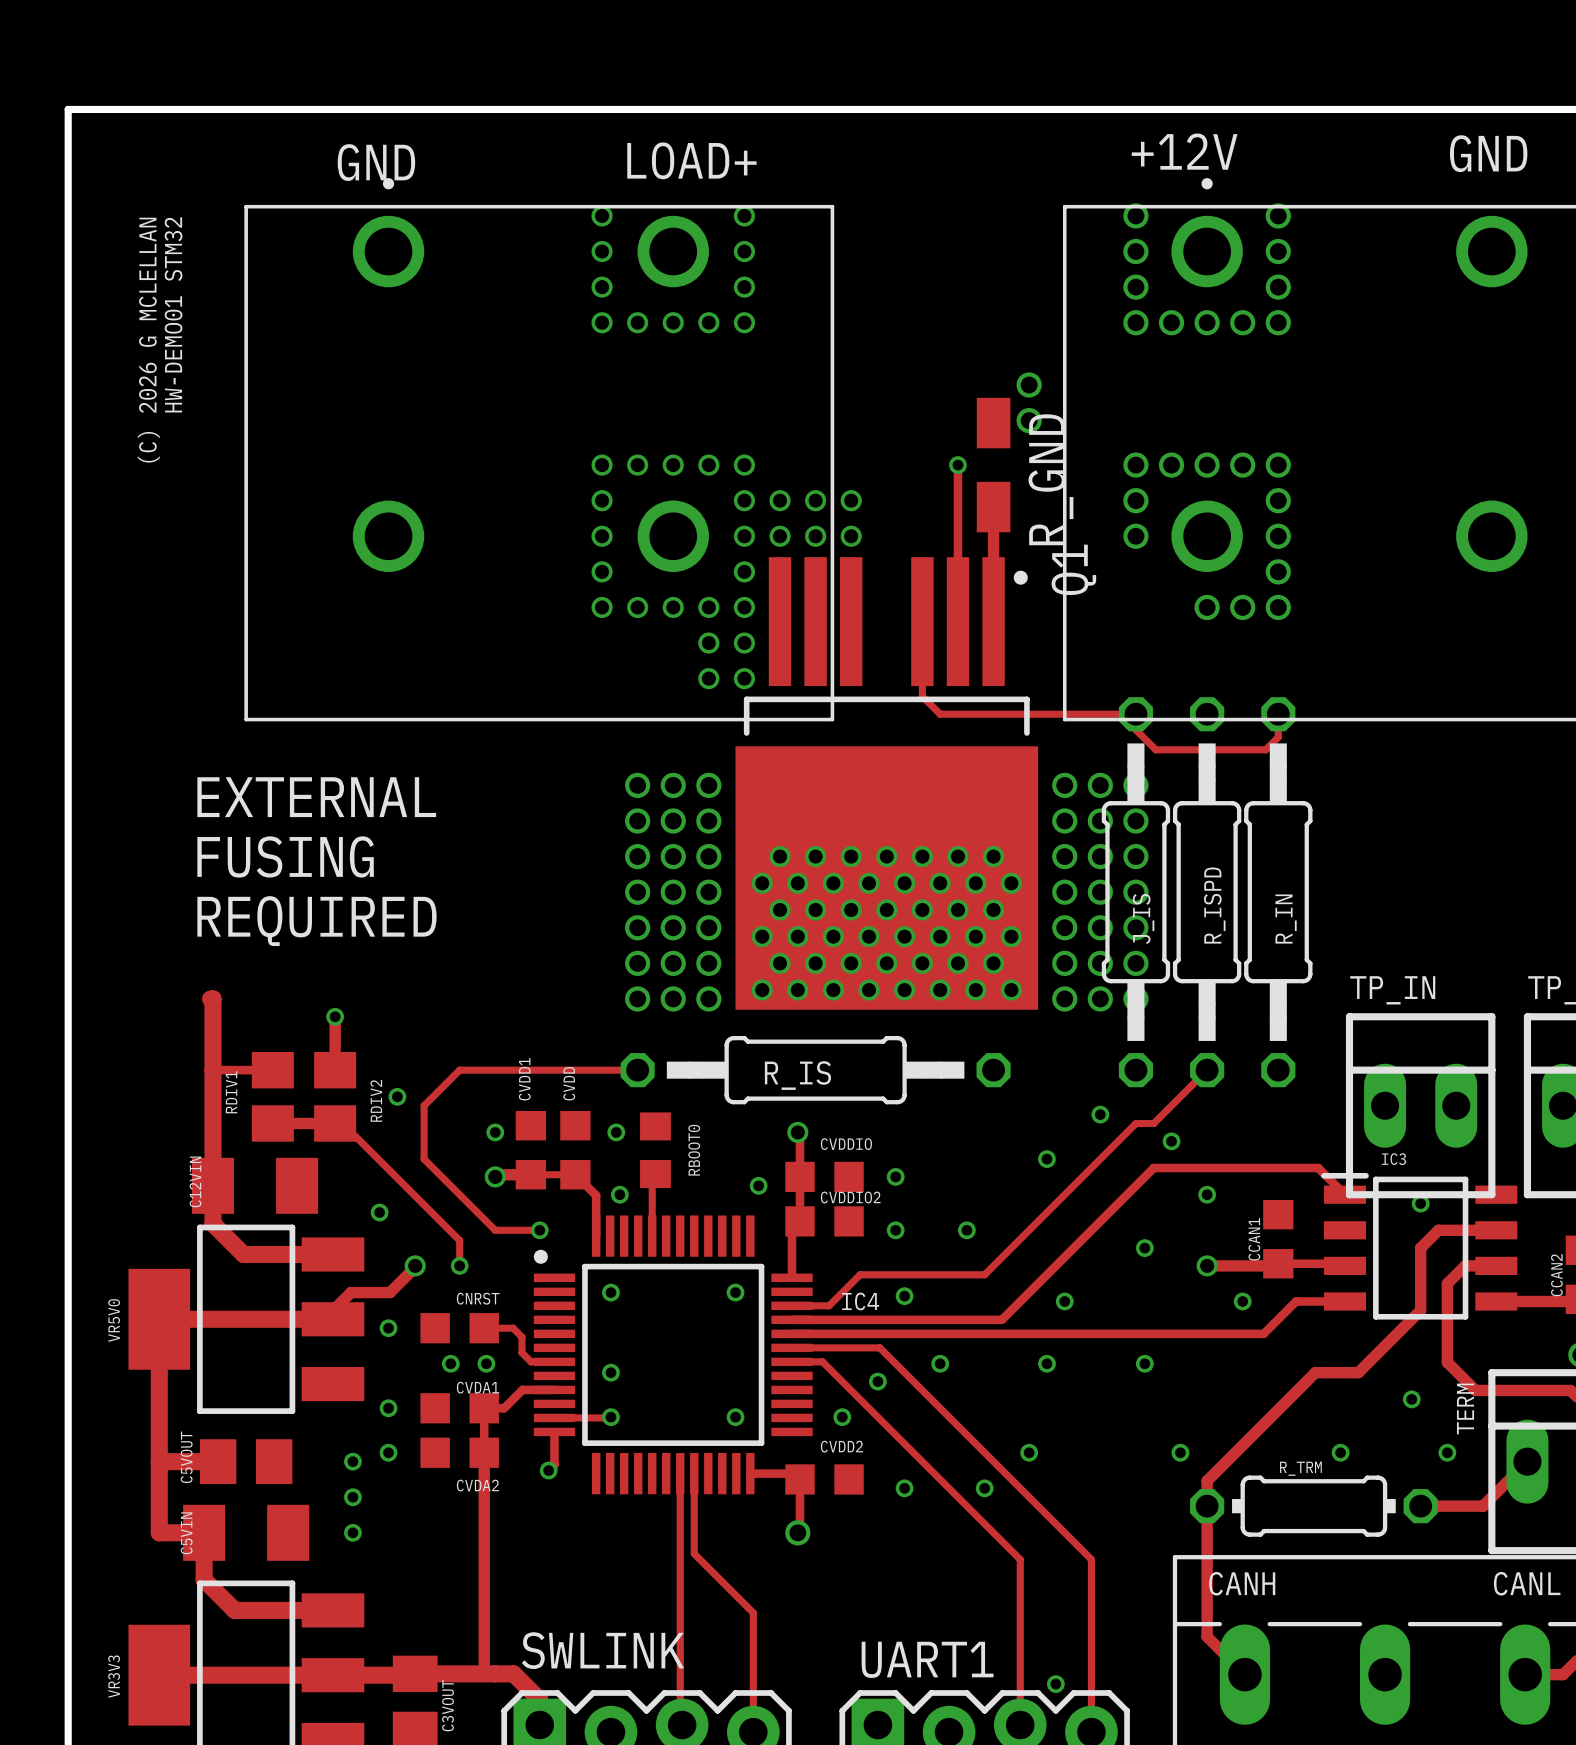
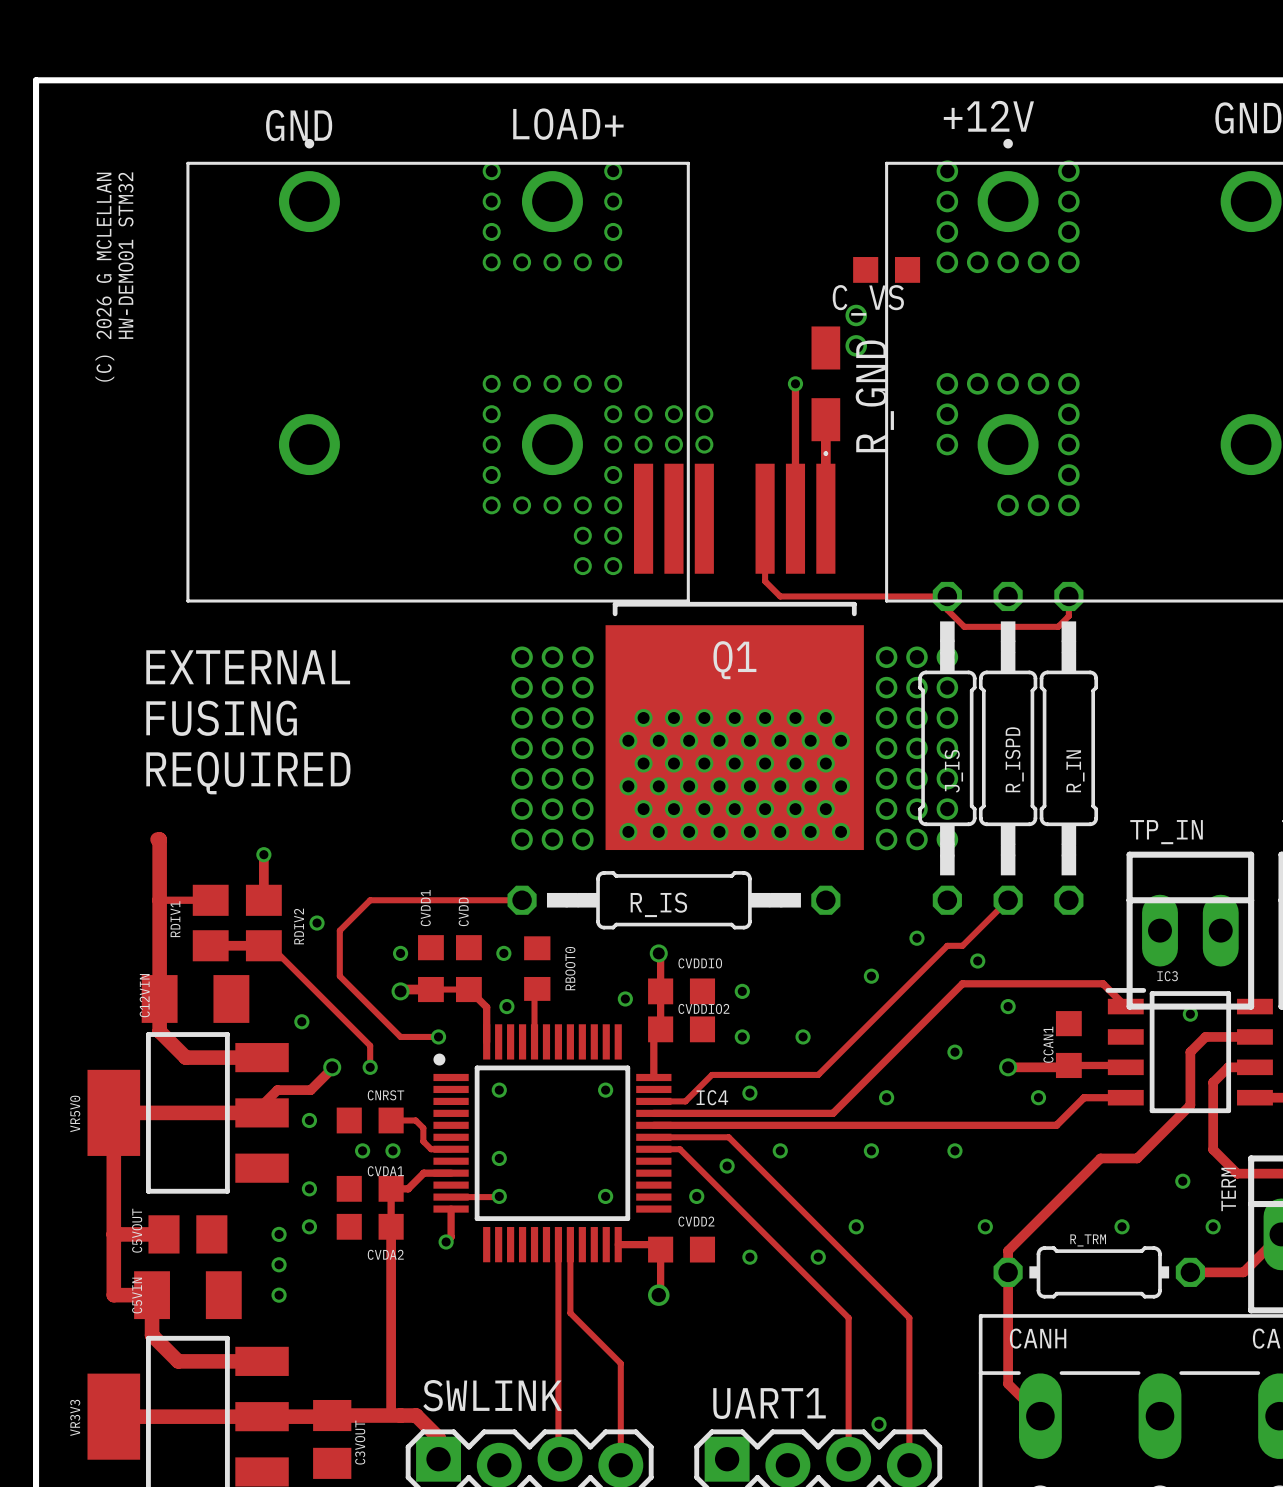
C_VS: none -> (886, 269)
Q1 footprint: [735, 557, 1039, 1010] -> [605, 451, 864, 851]
Q1 name position: Q1 (1073, 569) -> Q1 (734, 660)

